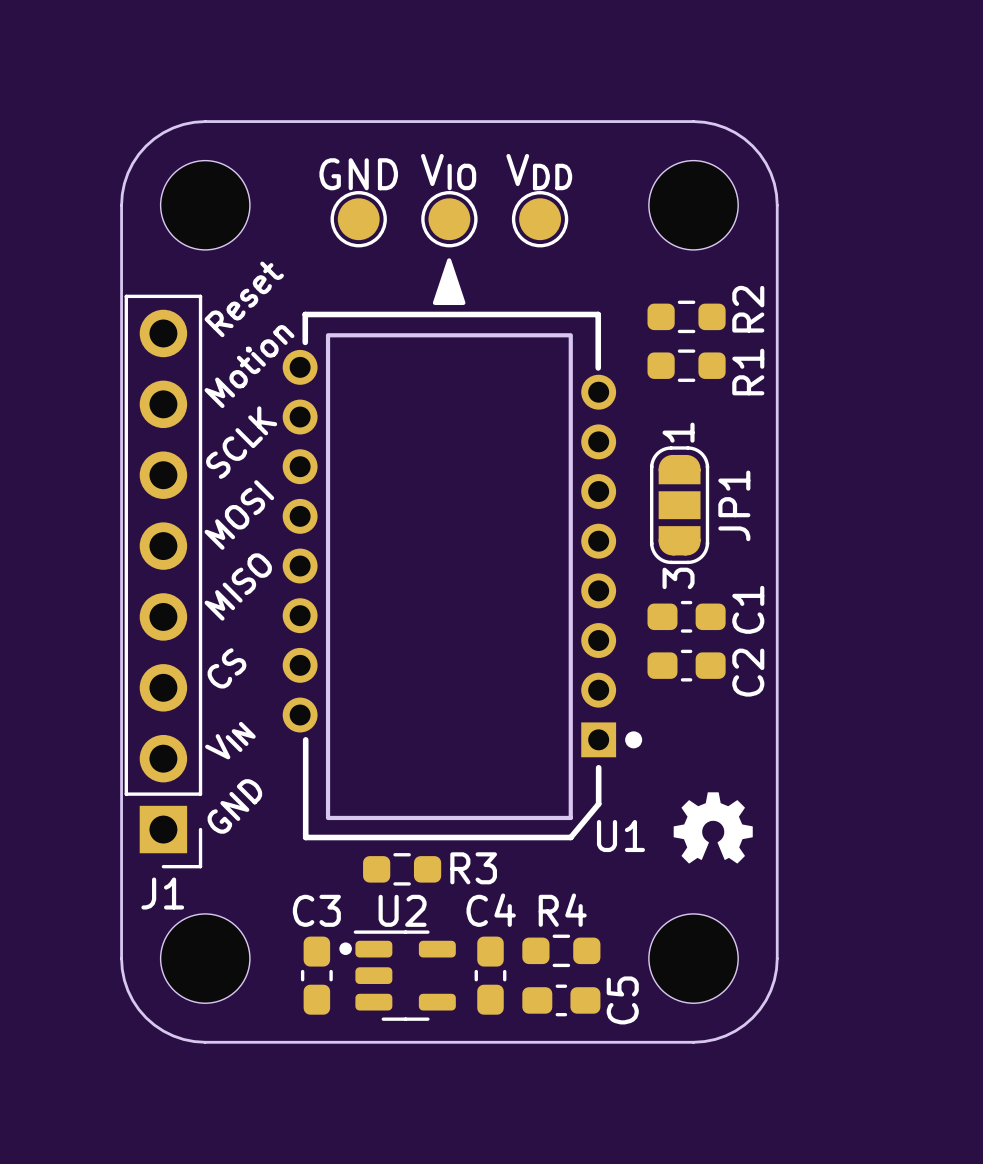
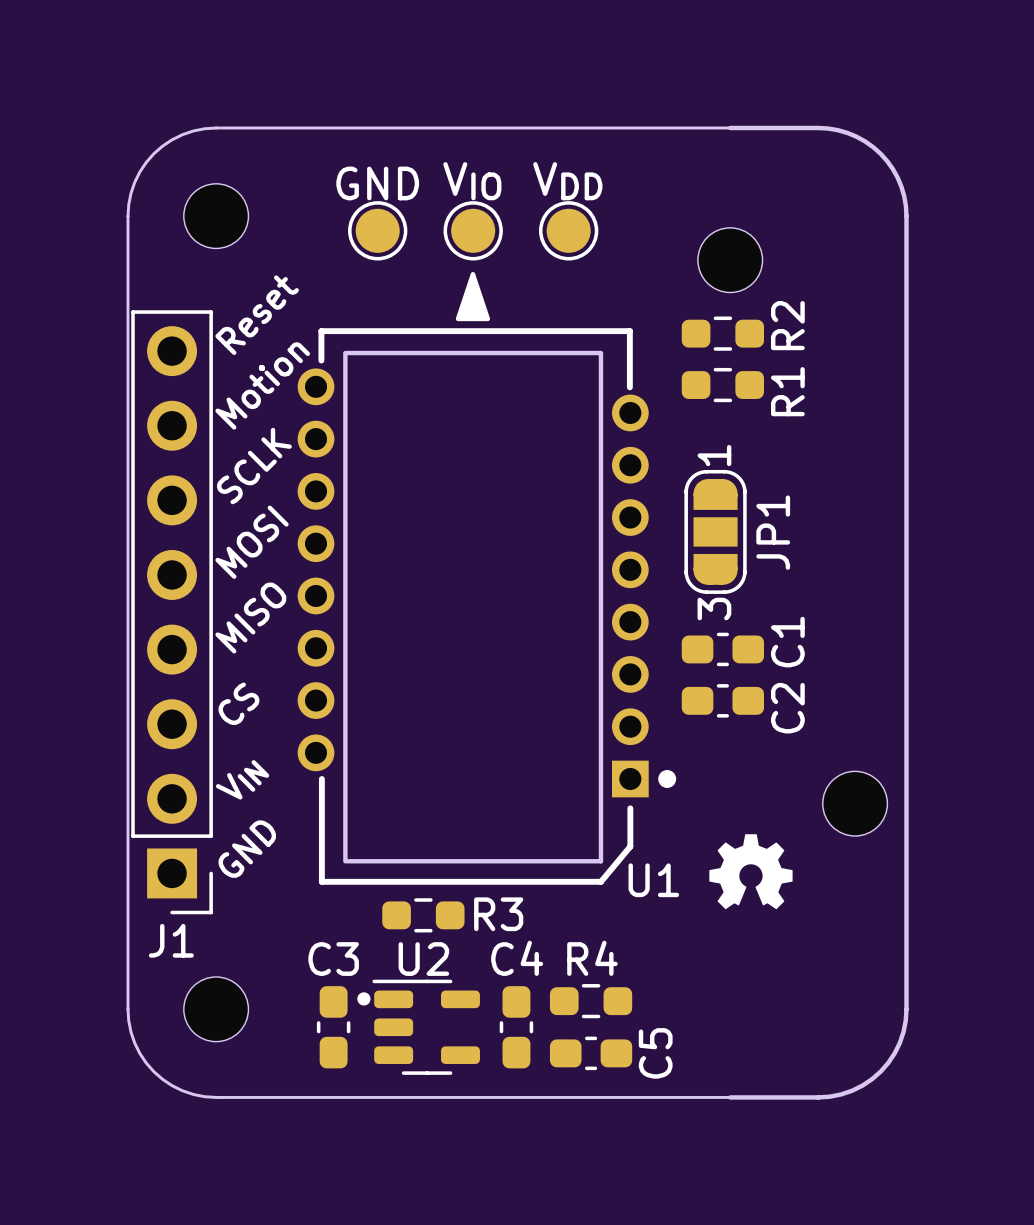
board edge: (693, 121) (715, 124) (744, 138) (766, 163) (776, 194) (777, 958) (770, 990) (752, 1017) (725, 1035) (693, 1042) -> (730, 128) (828, 128) (856, 136) (873, 147) (892, 169) (901, 187) (906, 216) (906, 1009) (903, 1032) (899, 1043) (888, 1062) (872, 1079) (852, 1090) (841, 1094) (818, 1097) (730, 1097)
part footprint: [160, 160, 250, 250] -> [183, 183, 249, 249]
part: (693, 205) -> none
part: none -> (730, 260)
part: none -> (855, 803)
part footprint: [160, 913, 250, 1004] -> [183, 977, 249, 1042]
part: (693, 958) -> none

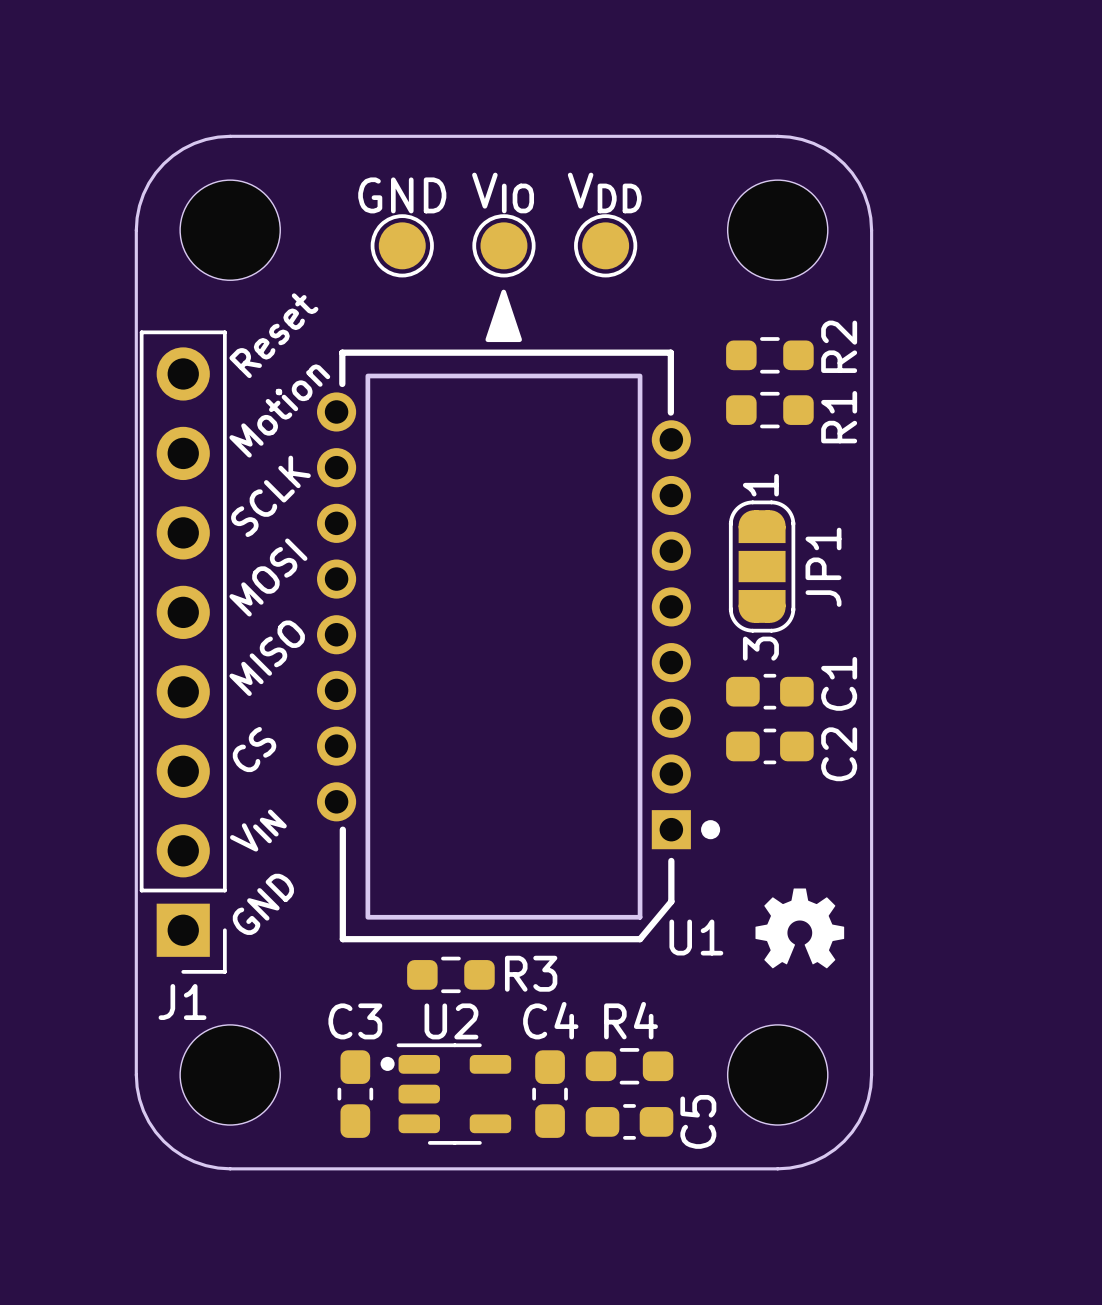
board edge: (730, 128) (828, 128) (856, 136) (873, 147) (892, 169) (901, 187) (906, 216) (906, 1009) (903, 1032) (899, 1043) (888, 1062) (872, 1079) (852, 1090) (841, 1094) (818, 1097) (730, 1097) -> (777, 136) (802, 139) (824, 148) (834, 155) (852, 173) (859, 183) (864, 194) (870, 217) (871, 1074) (870, 1087) (864, 1110) (859, 1121) (844, 1141) (824, 1156) (813, 1161) (802, 1165) (777, 1168)
part footprint: [183, 183, 249, 249] -> [180, 180, 281, 281]
part: none -> (777, 230)
part: (730, 260) -> none
part: (855, 803) -> none
part footprint: [183, 977, 249, 1042] -> [180, 1024, 281, 1126]
part: none -> (777, 1074)

